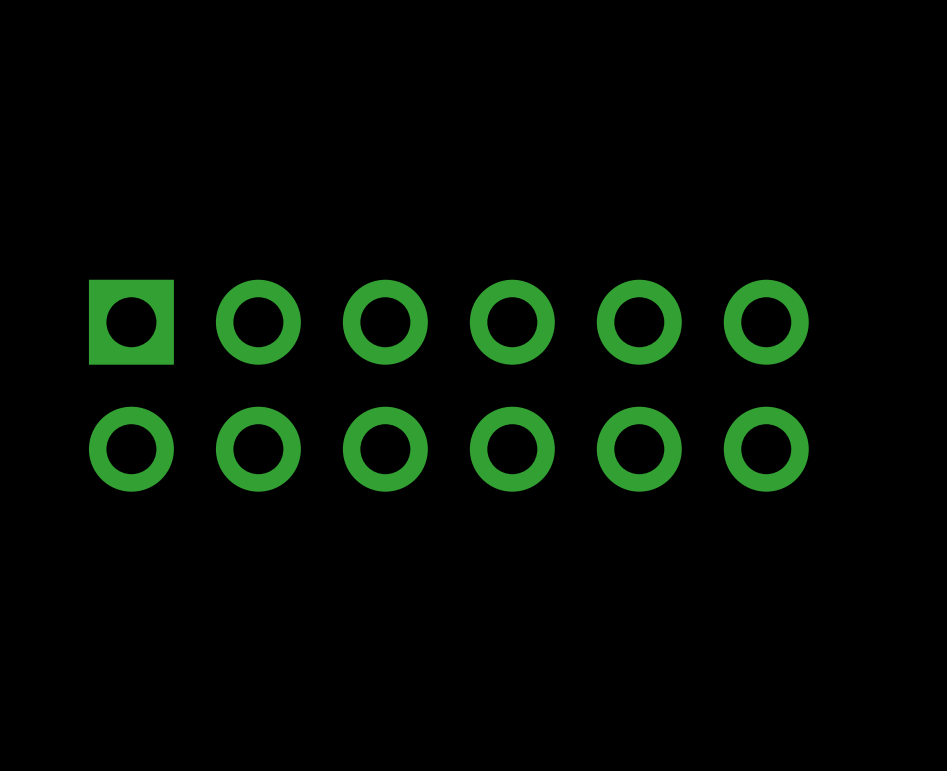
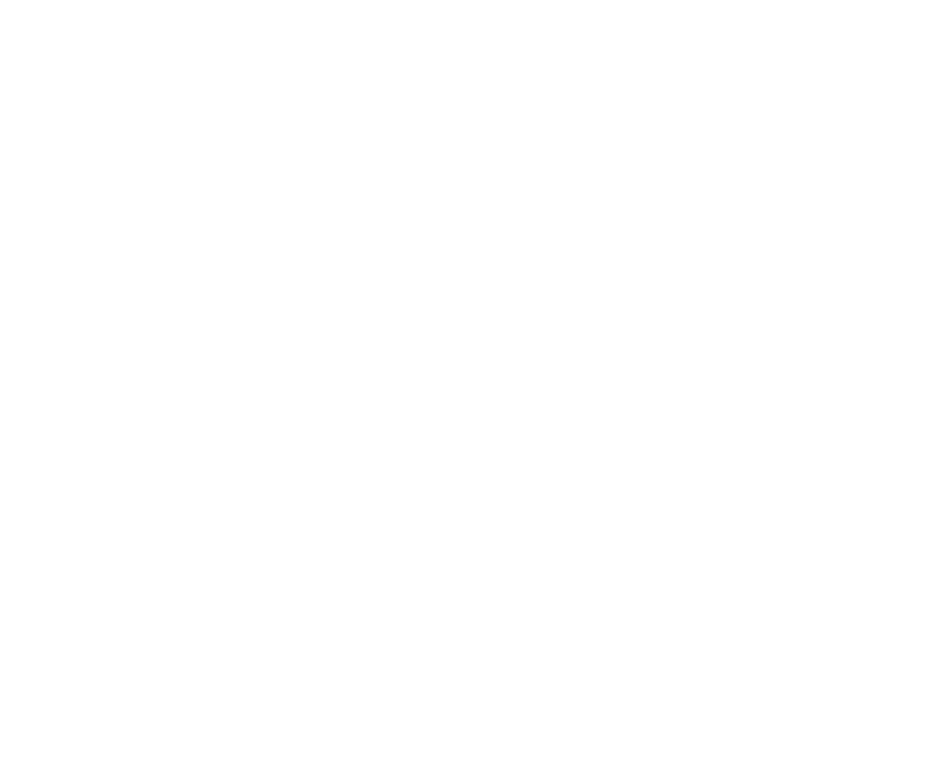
part: (448, 385) -> none

